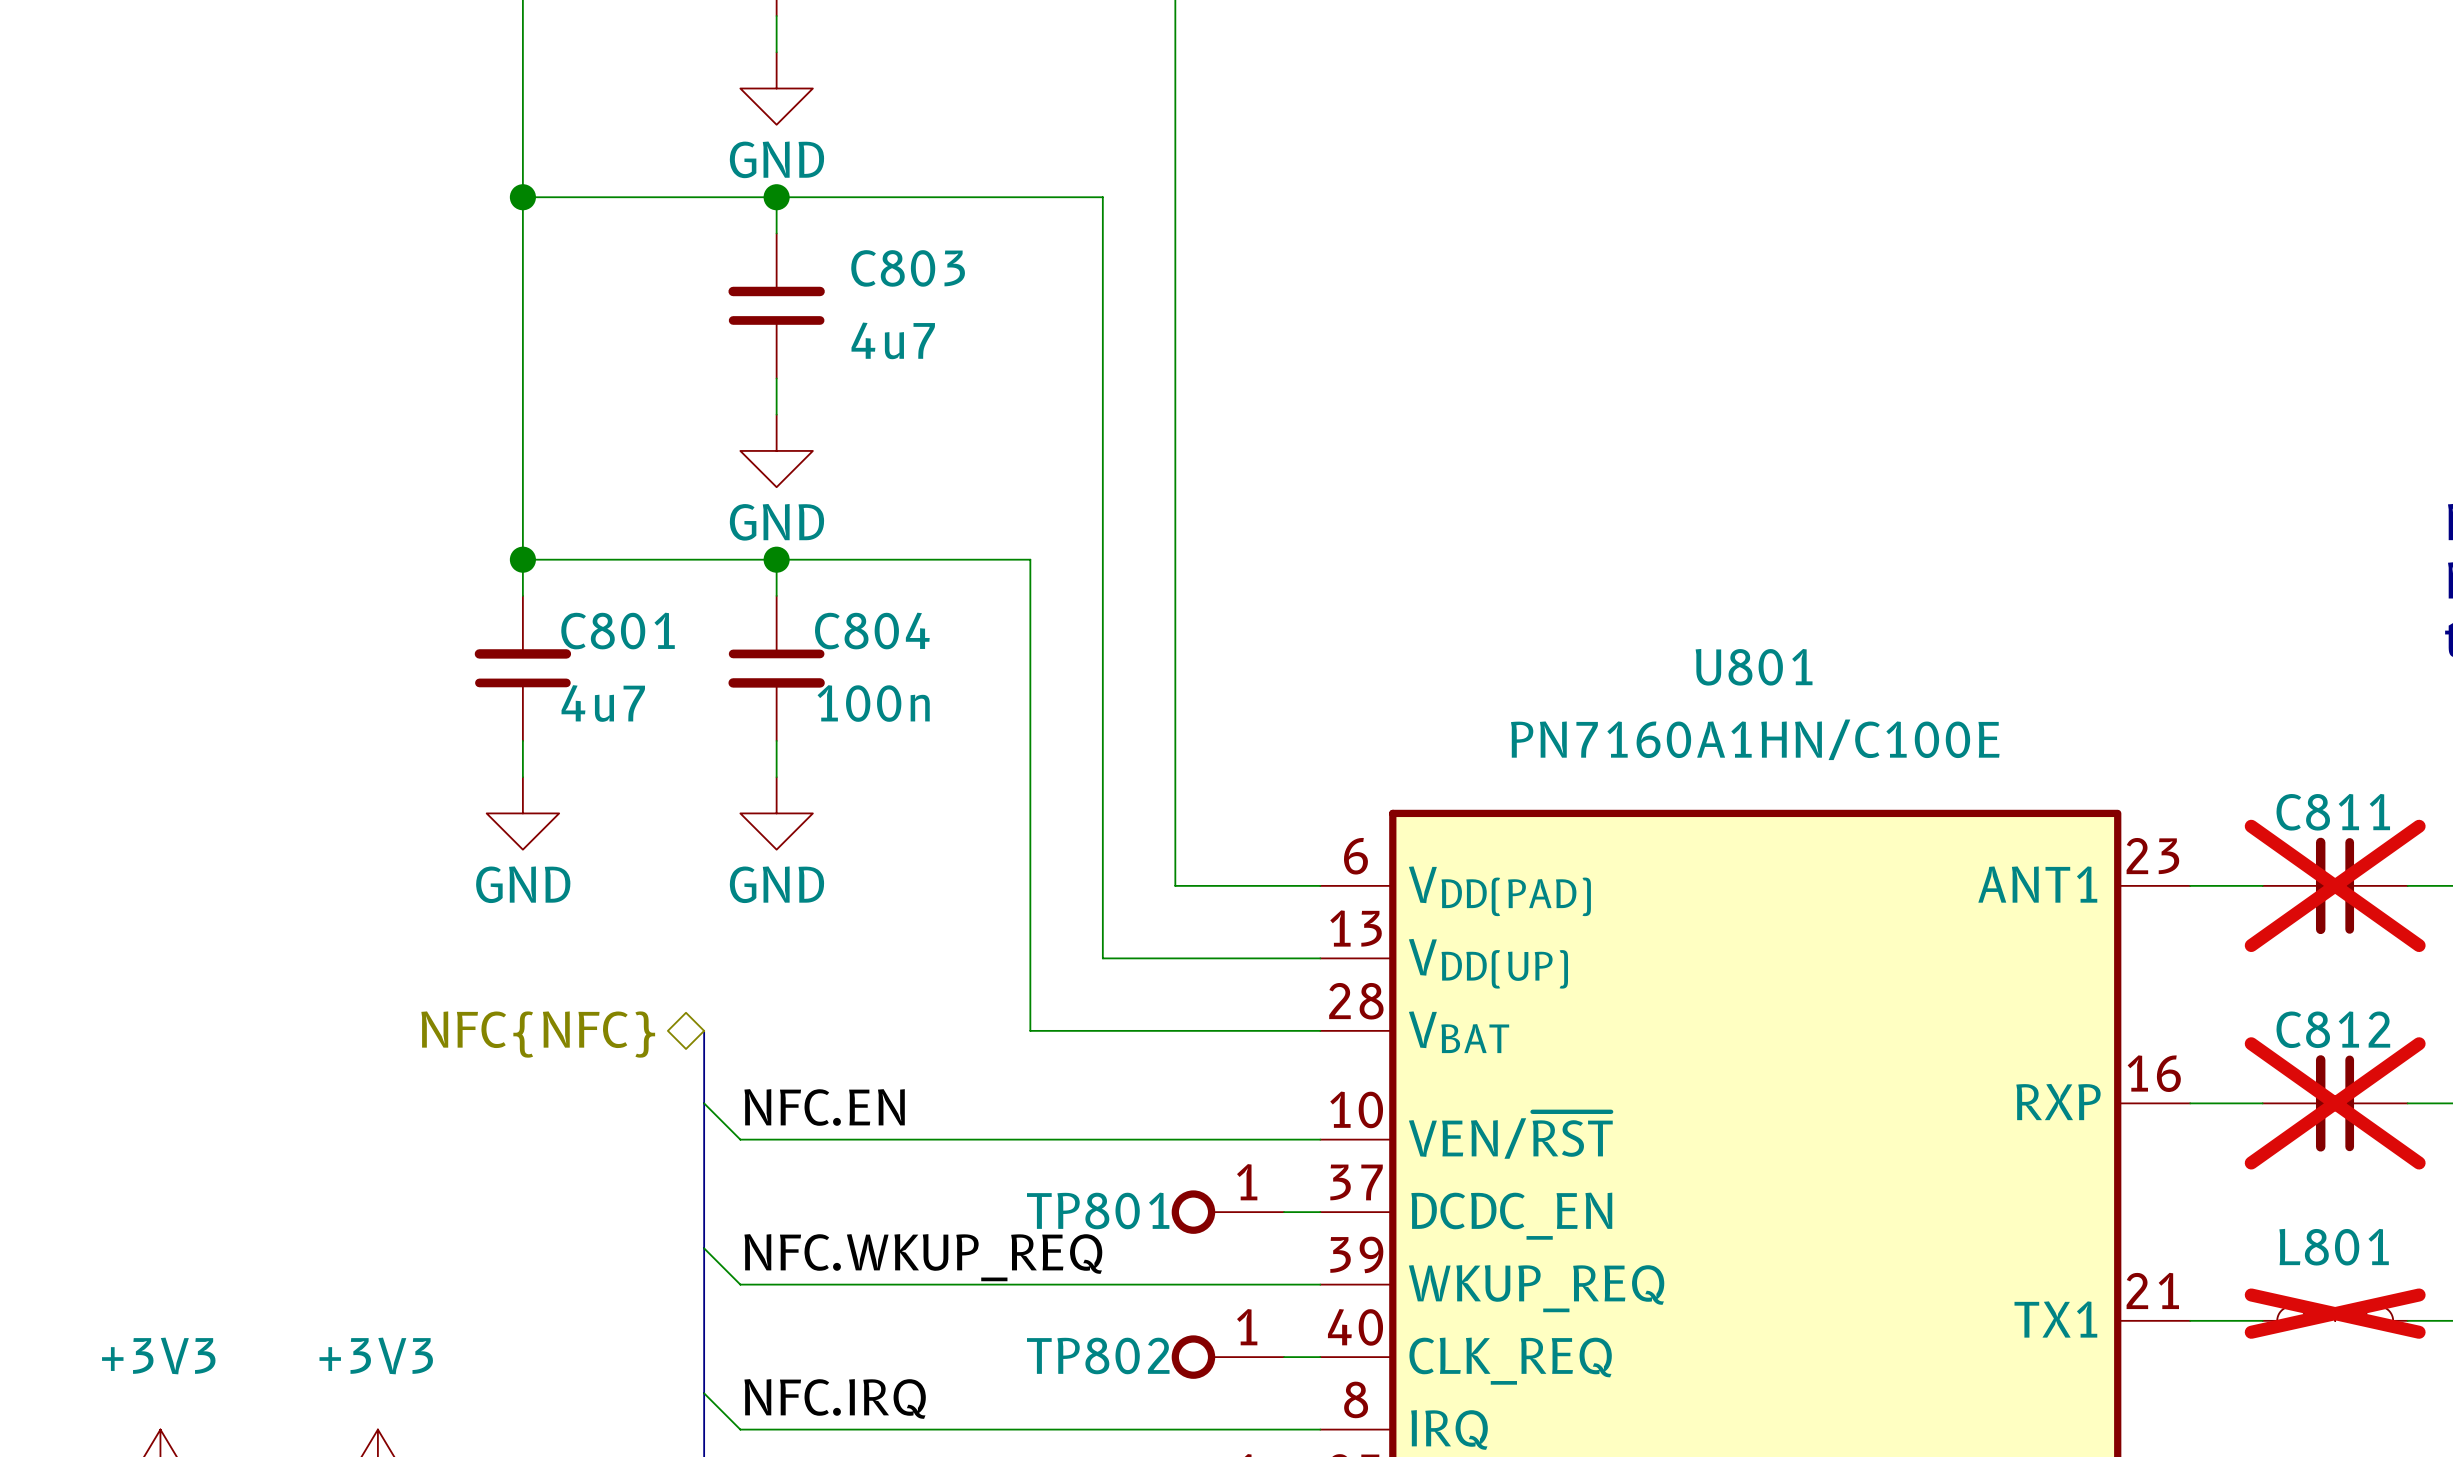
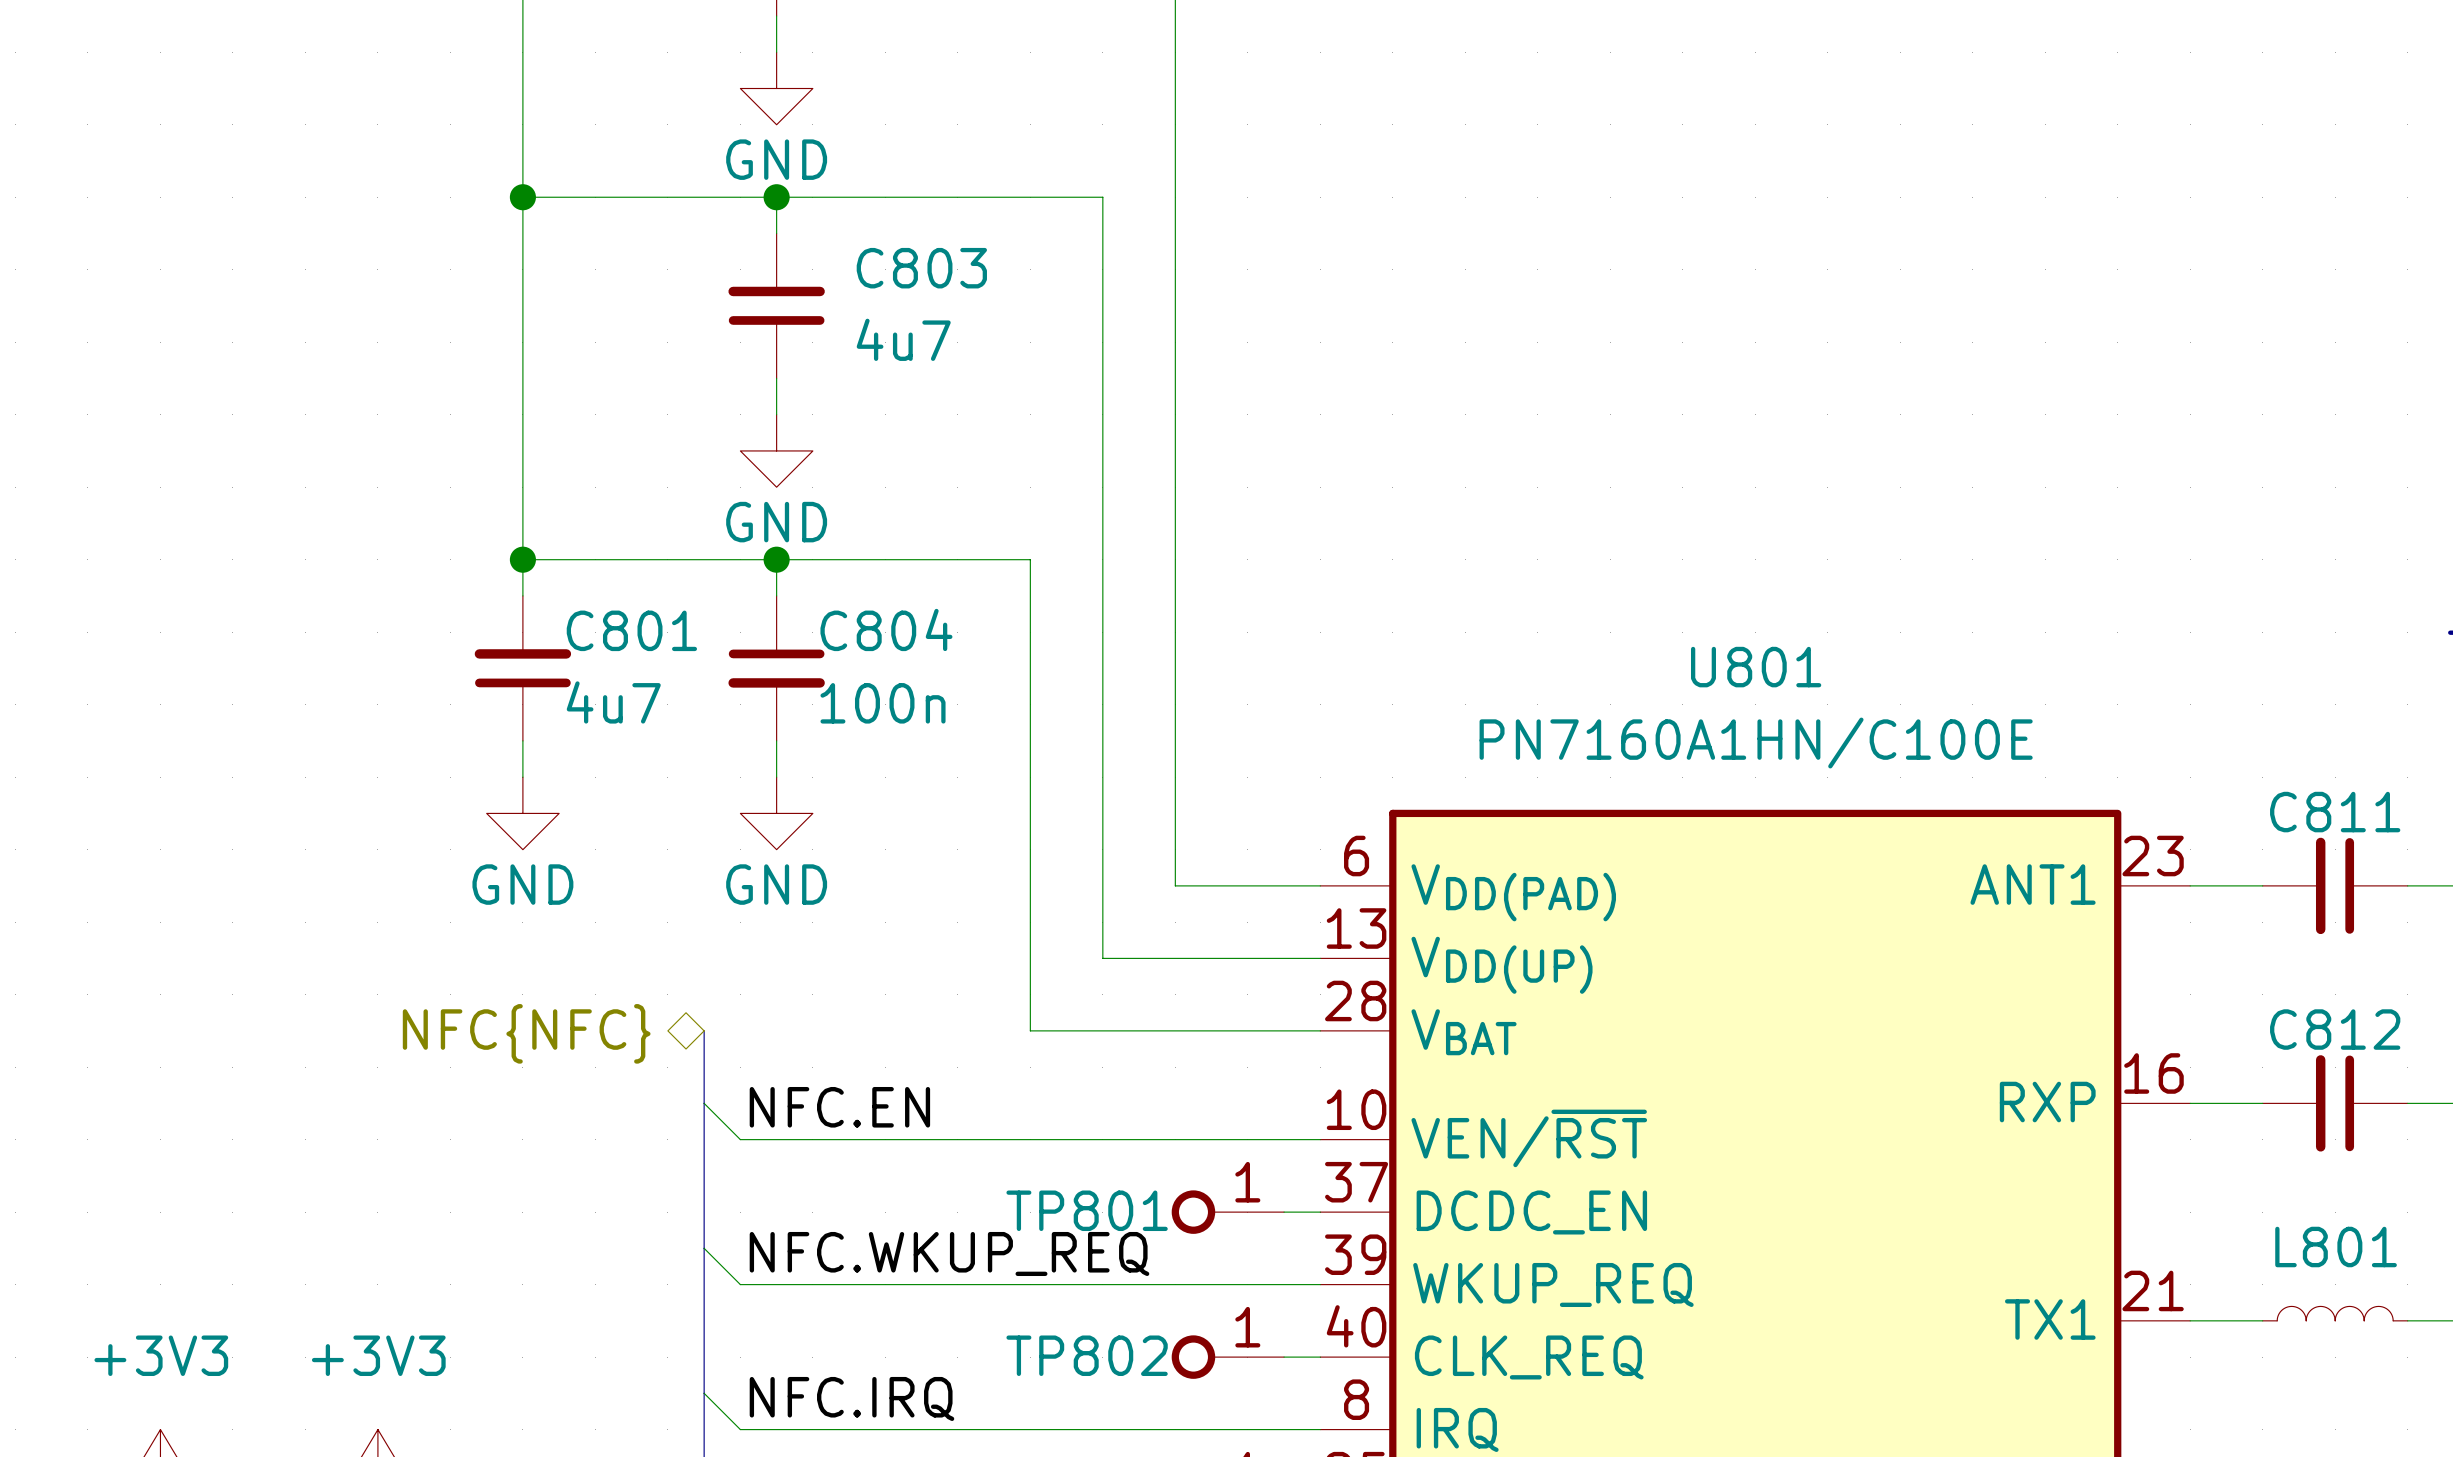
C811 do-not-place cross: (2335, 885) -> none
C812 do-not-place cross: (2335, 1103) -> none
L801 do-not-place cross: (2335, 1313) -> none

